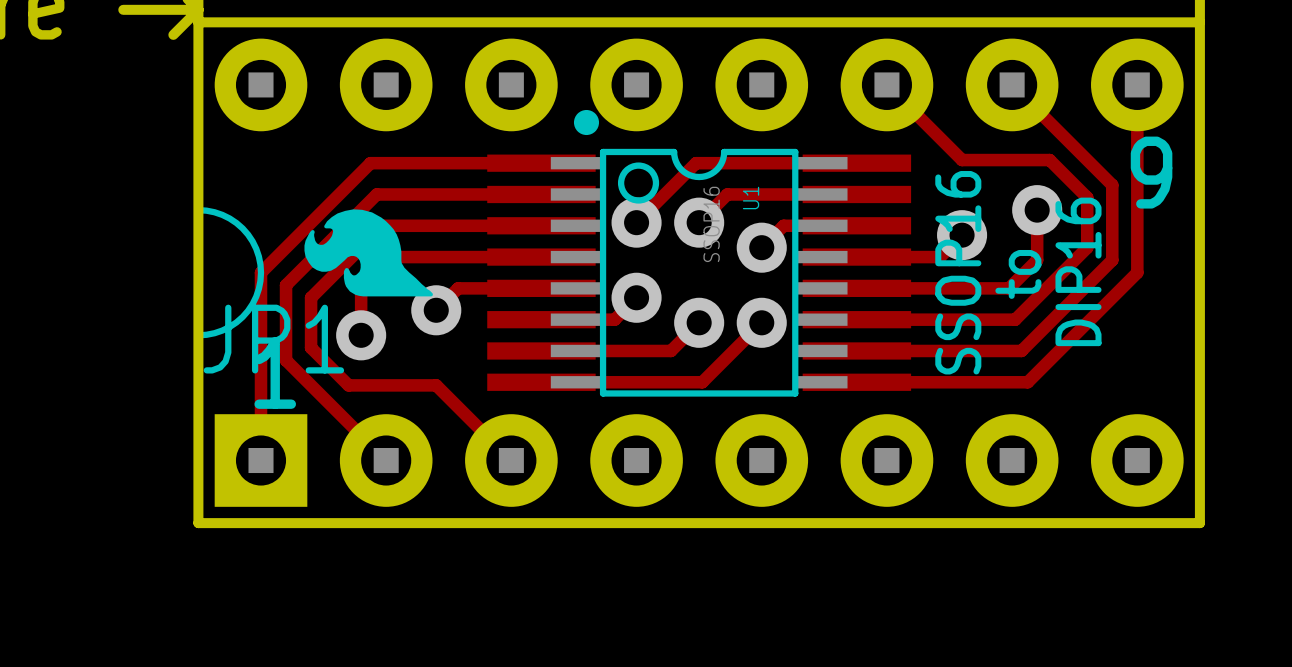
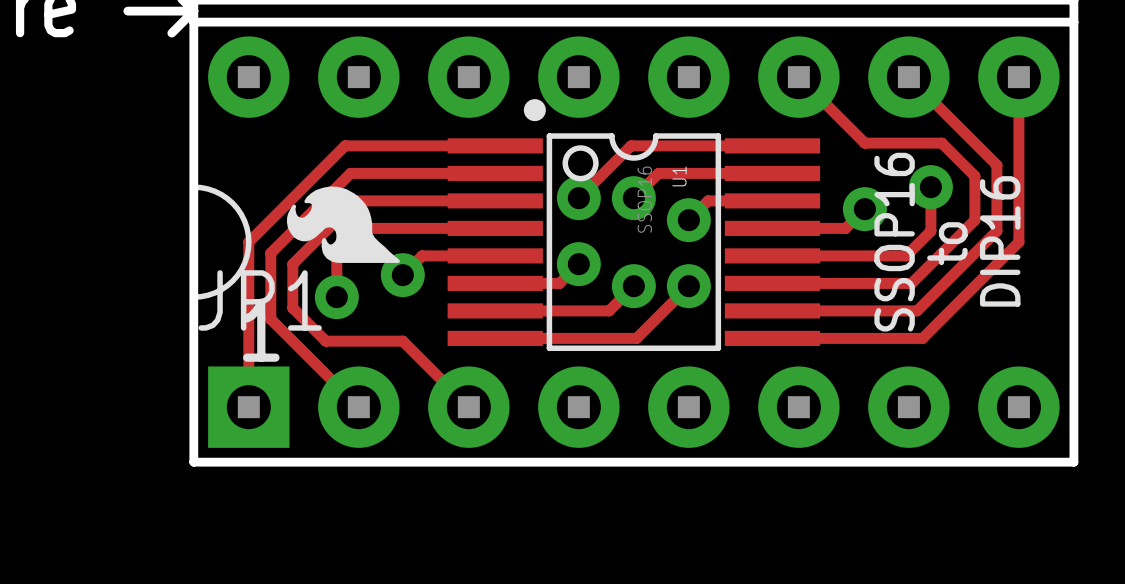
U1 footprint: [487, 109, 912, 397] -> [447, 99, 821, 352]
text: 9 (1151, 172) -> none
text position: DIP16 (1078, 271) -> DIP16 (1000, 241)
text position: SSOP16 (958, 272) -> SSOP16 (894, 242)
text position: to (1018, 274) -> to (947, 243)

